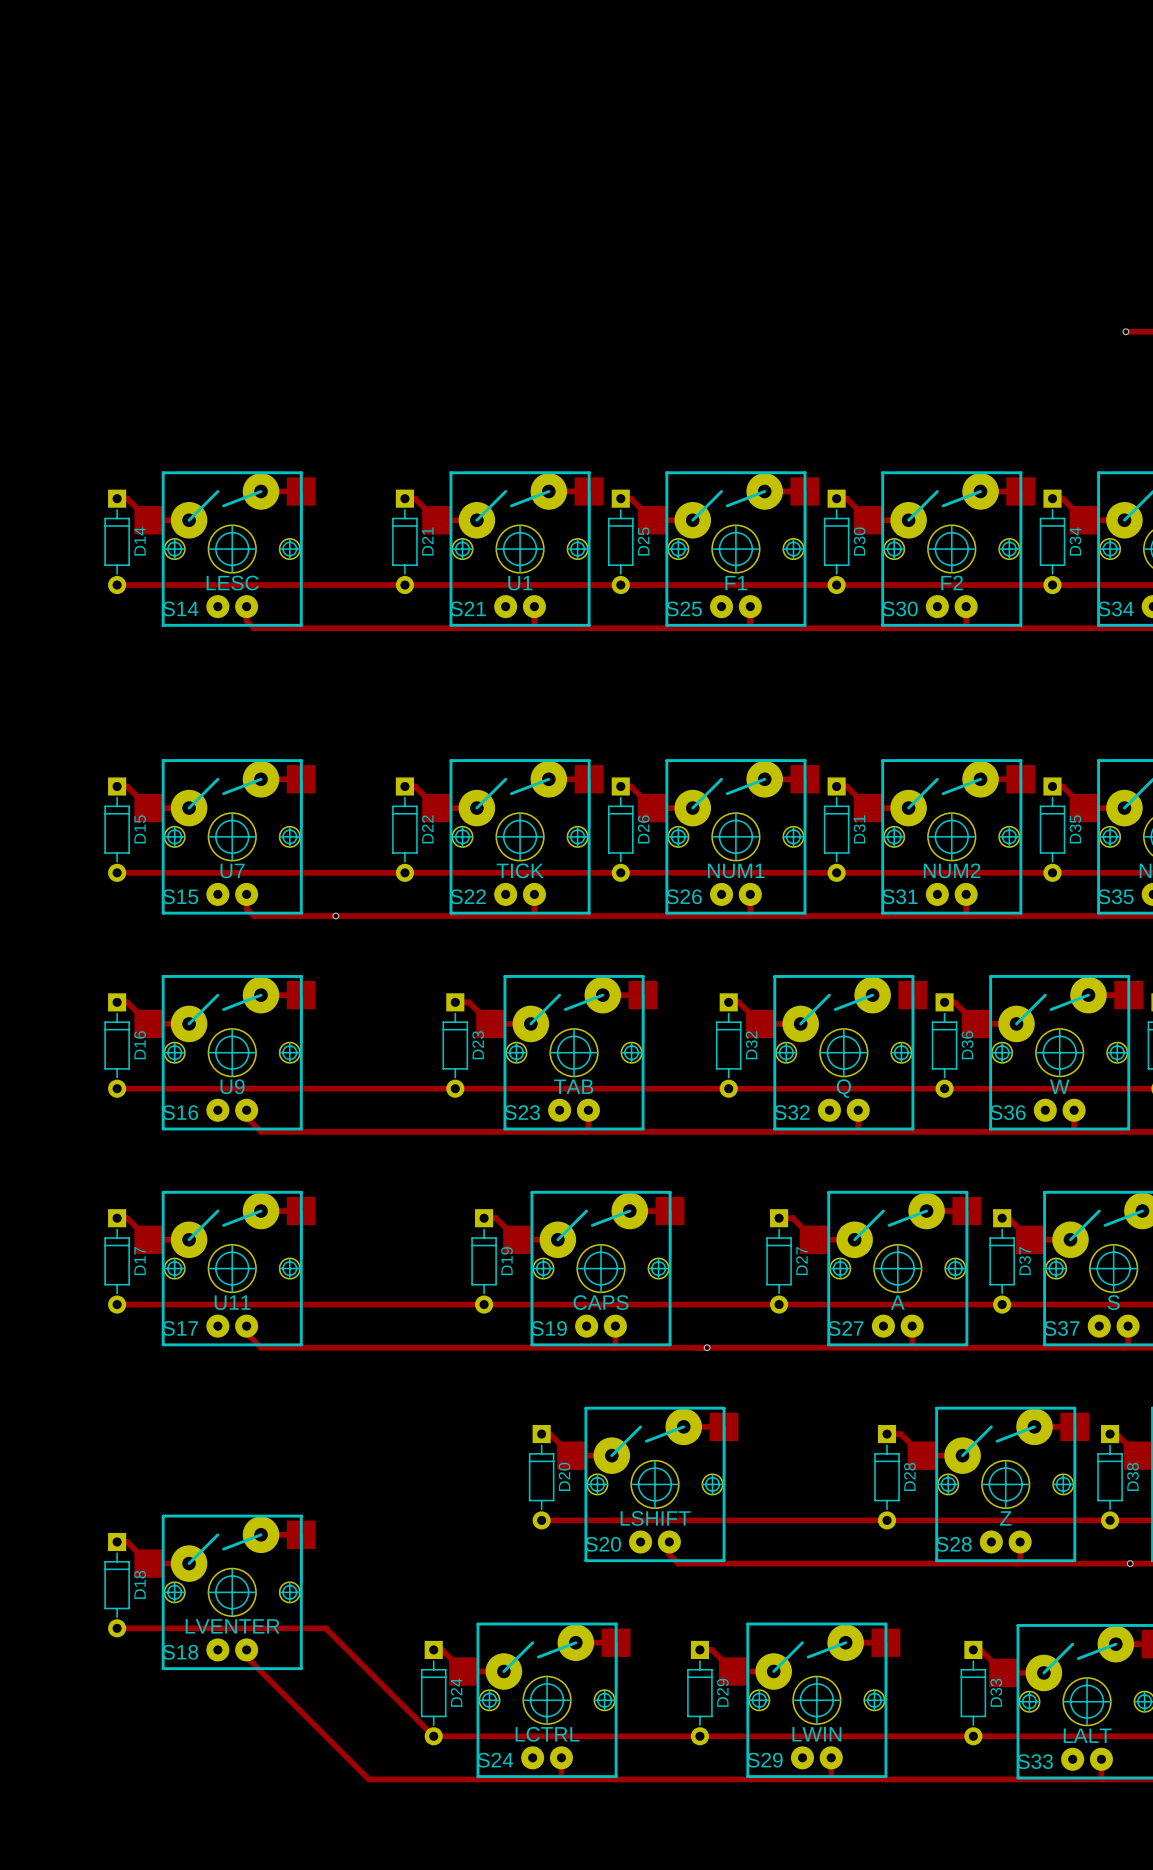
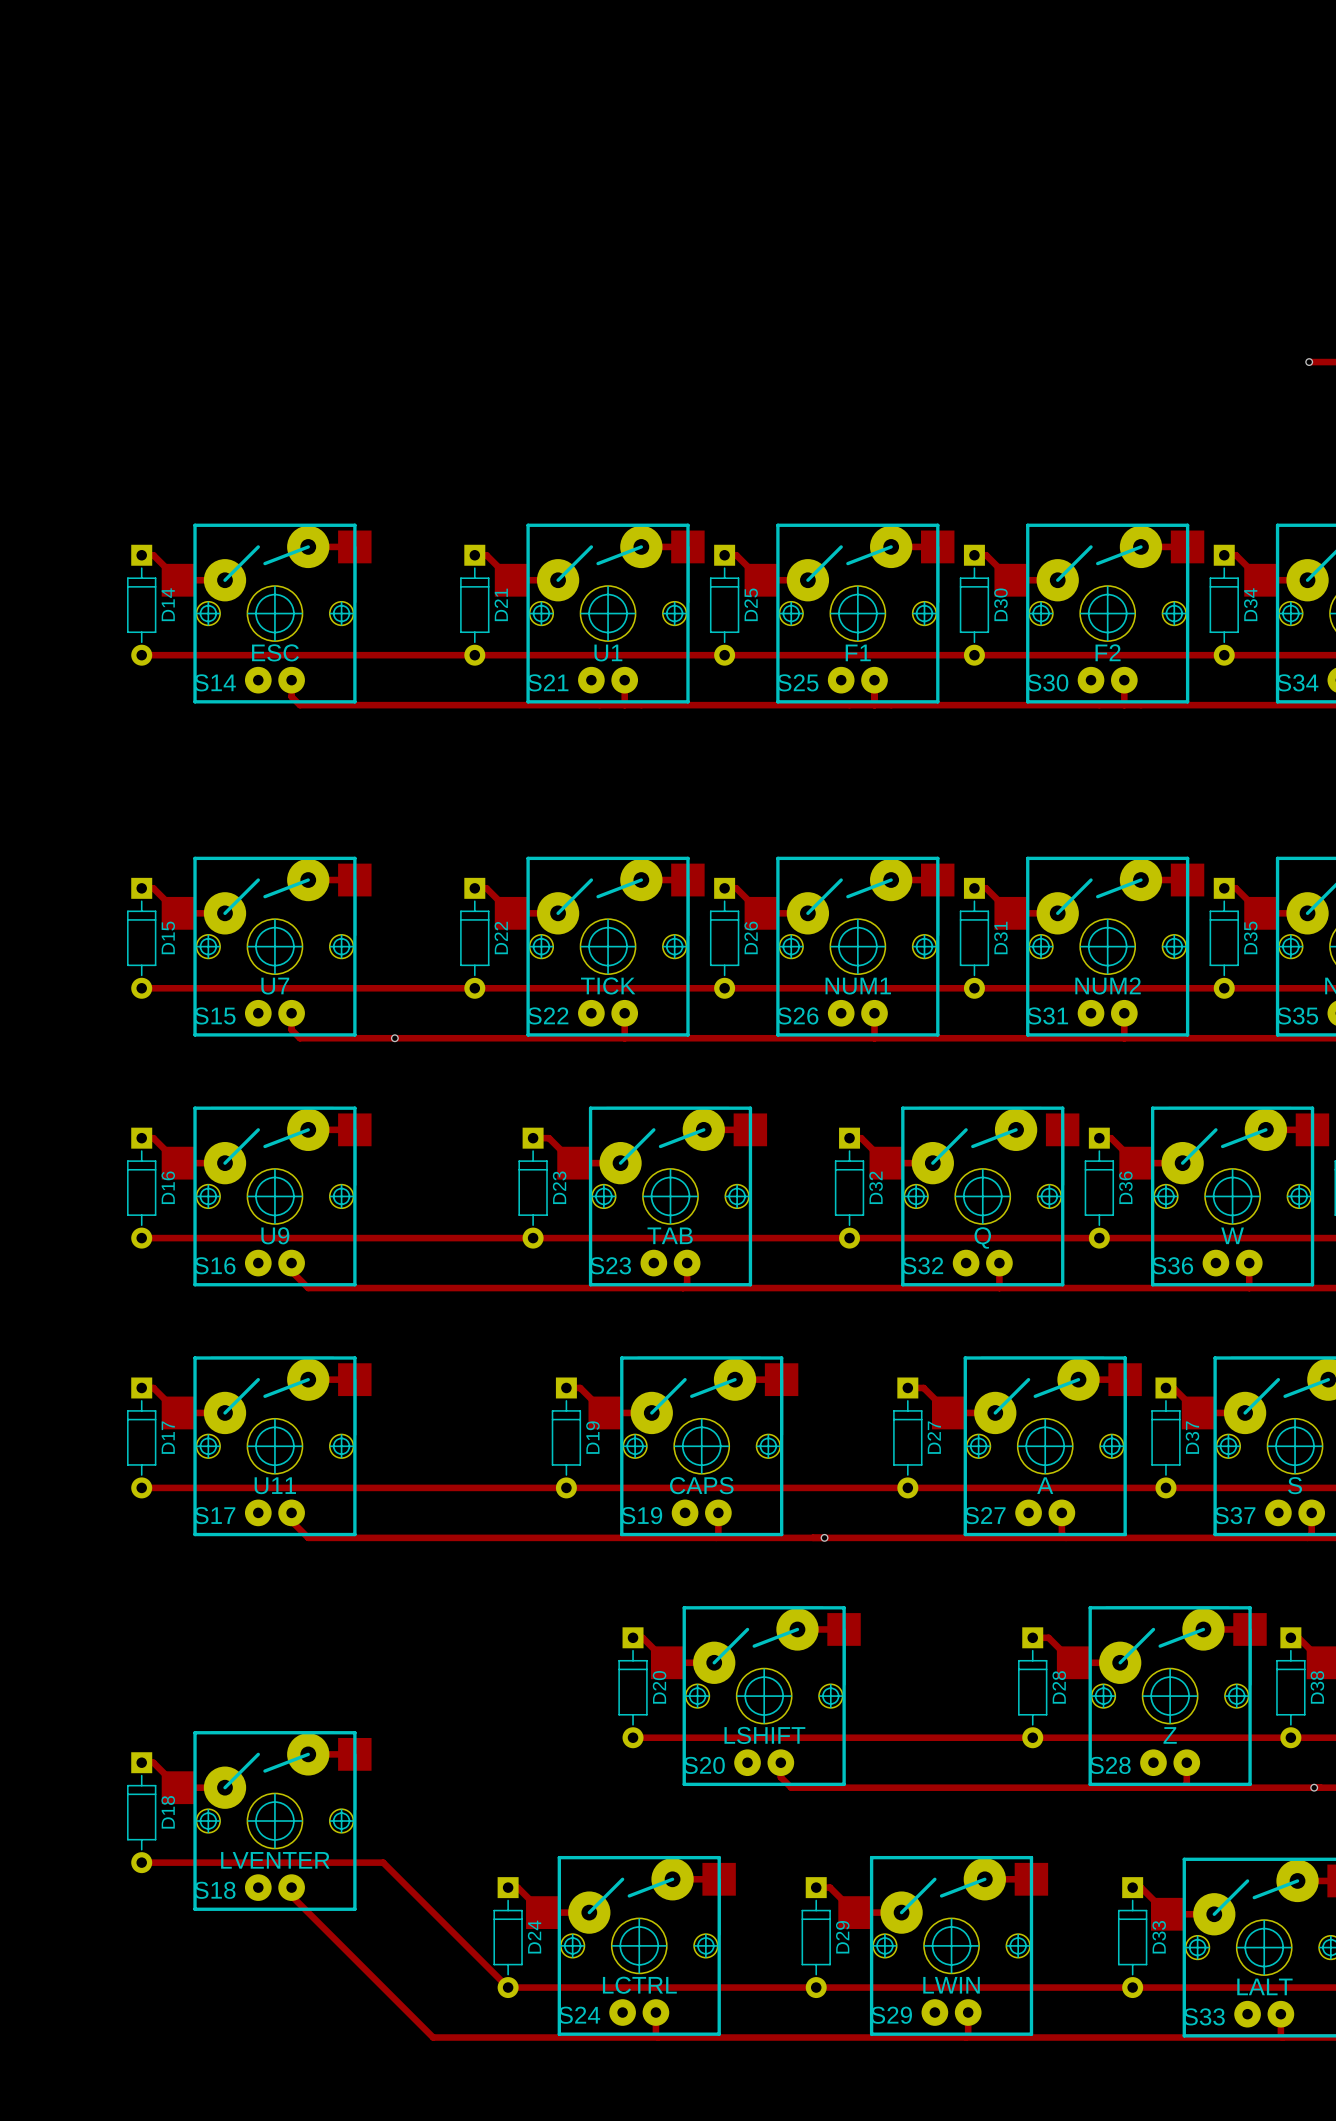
S14 value: LESC (232, 583) -> ESC (275, 652)

